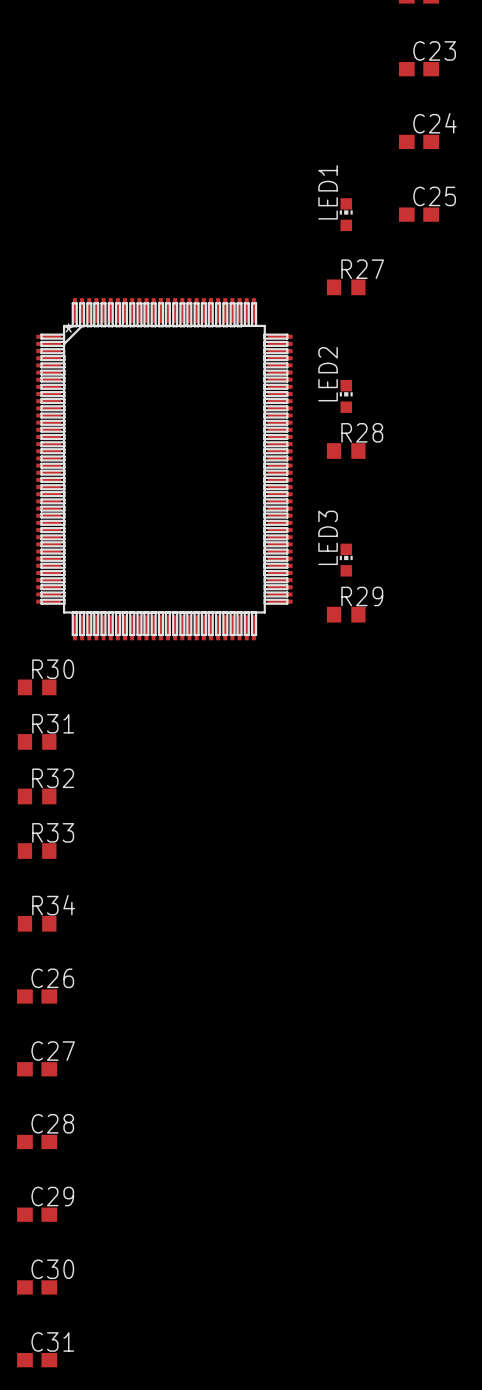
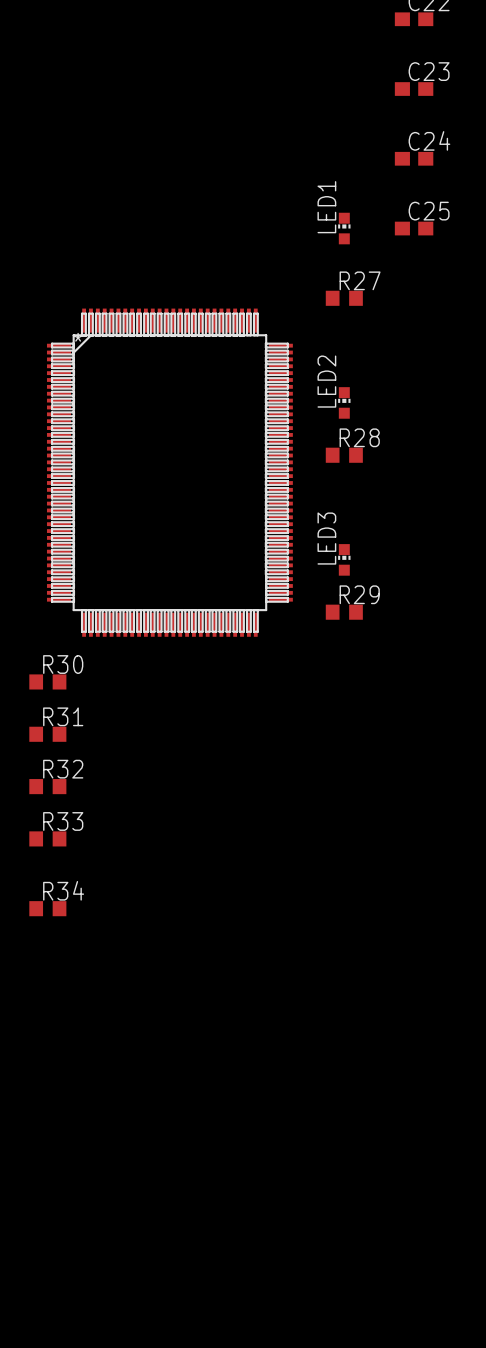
C26: (37, 996) -> none
C27: (37, 1069) -> none
C28: (37, 1141) -> none
C29: (37, 1214) -> none
C30: (37, 1287) -> none
C31: (37, 1360) -> none

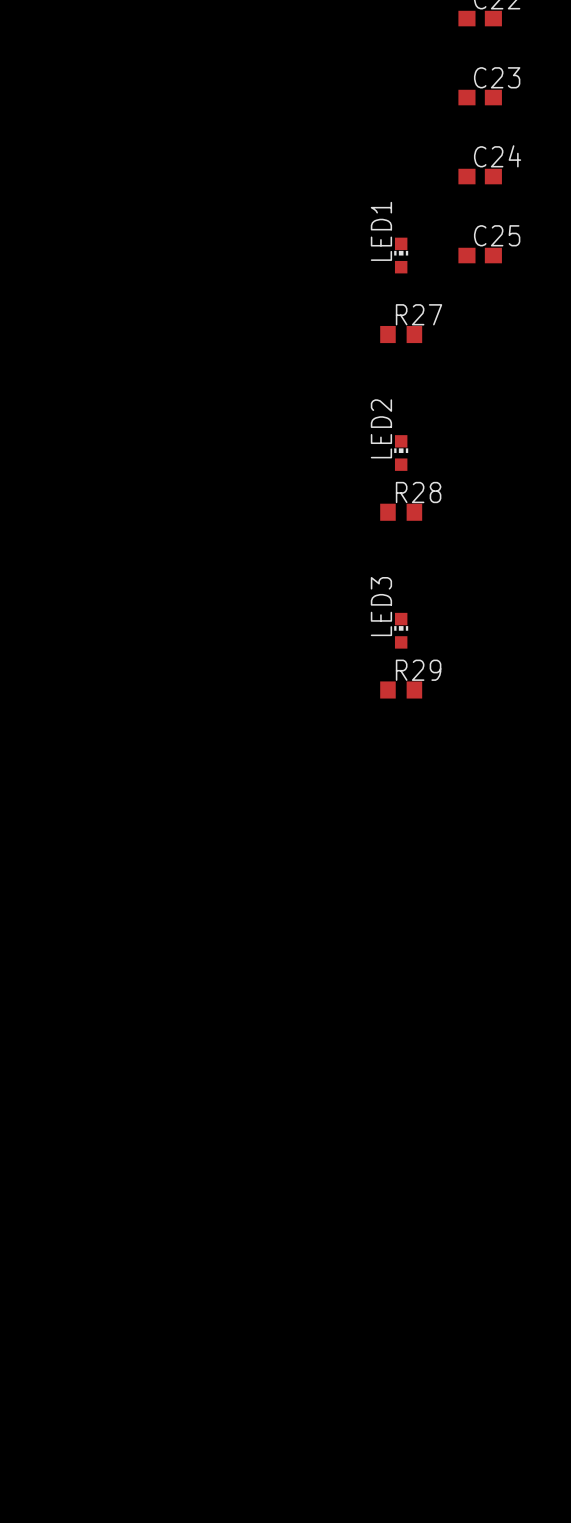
part: (169, 472) -> none
R30: (47, 681) -> none
R31: (47, 734) -> none
R32: (47, 786) -> none
R33: (47, 838) -> none
R34: (47, 908) -> none

